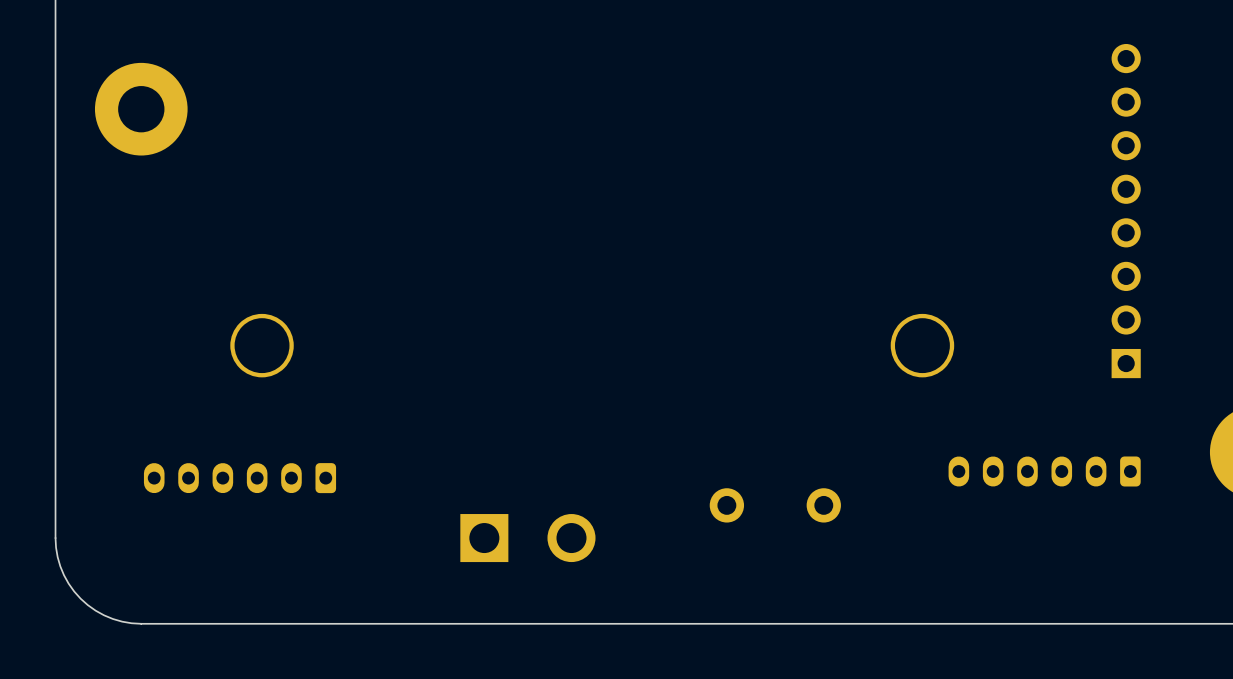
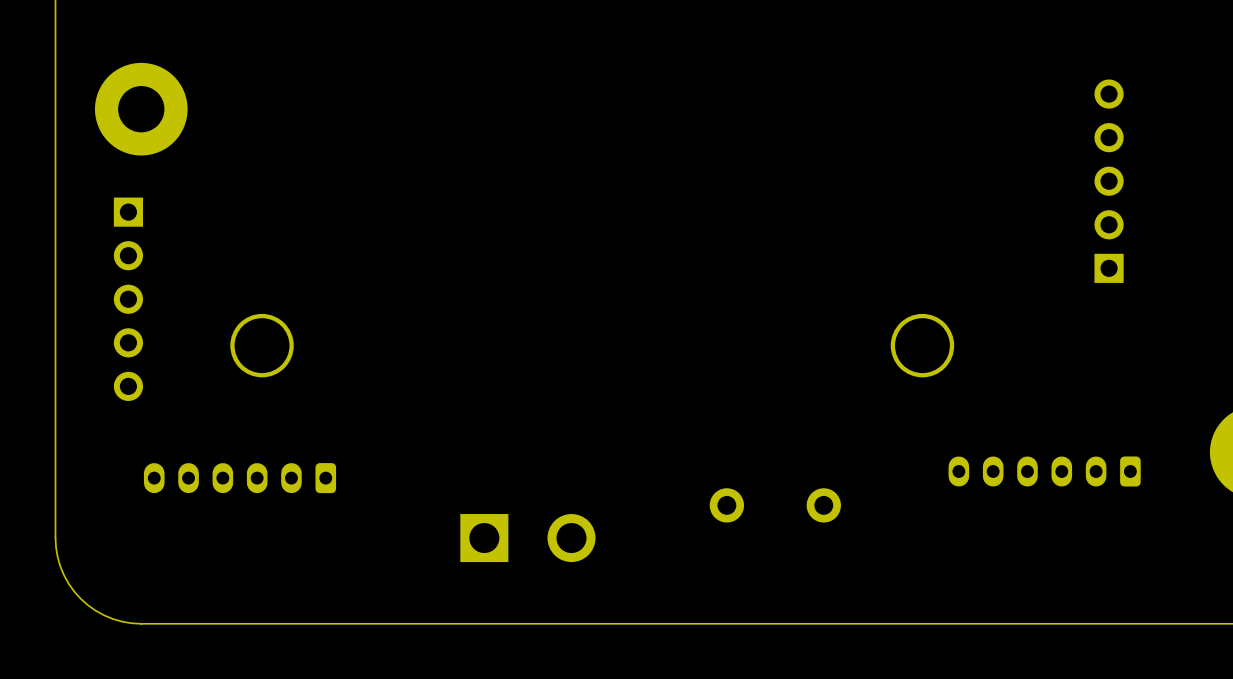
part: none -> (1109, 181)
part: (1126, 211) -> none
part: none -> (128, 299)

